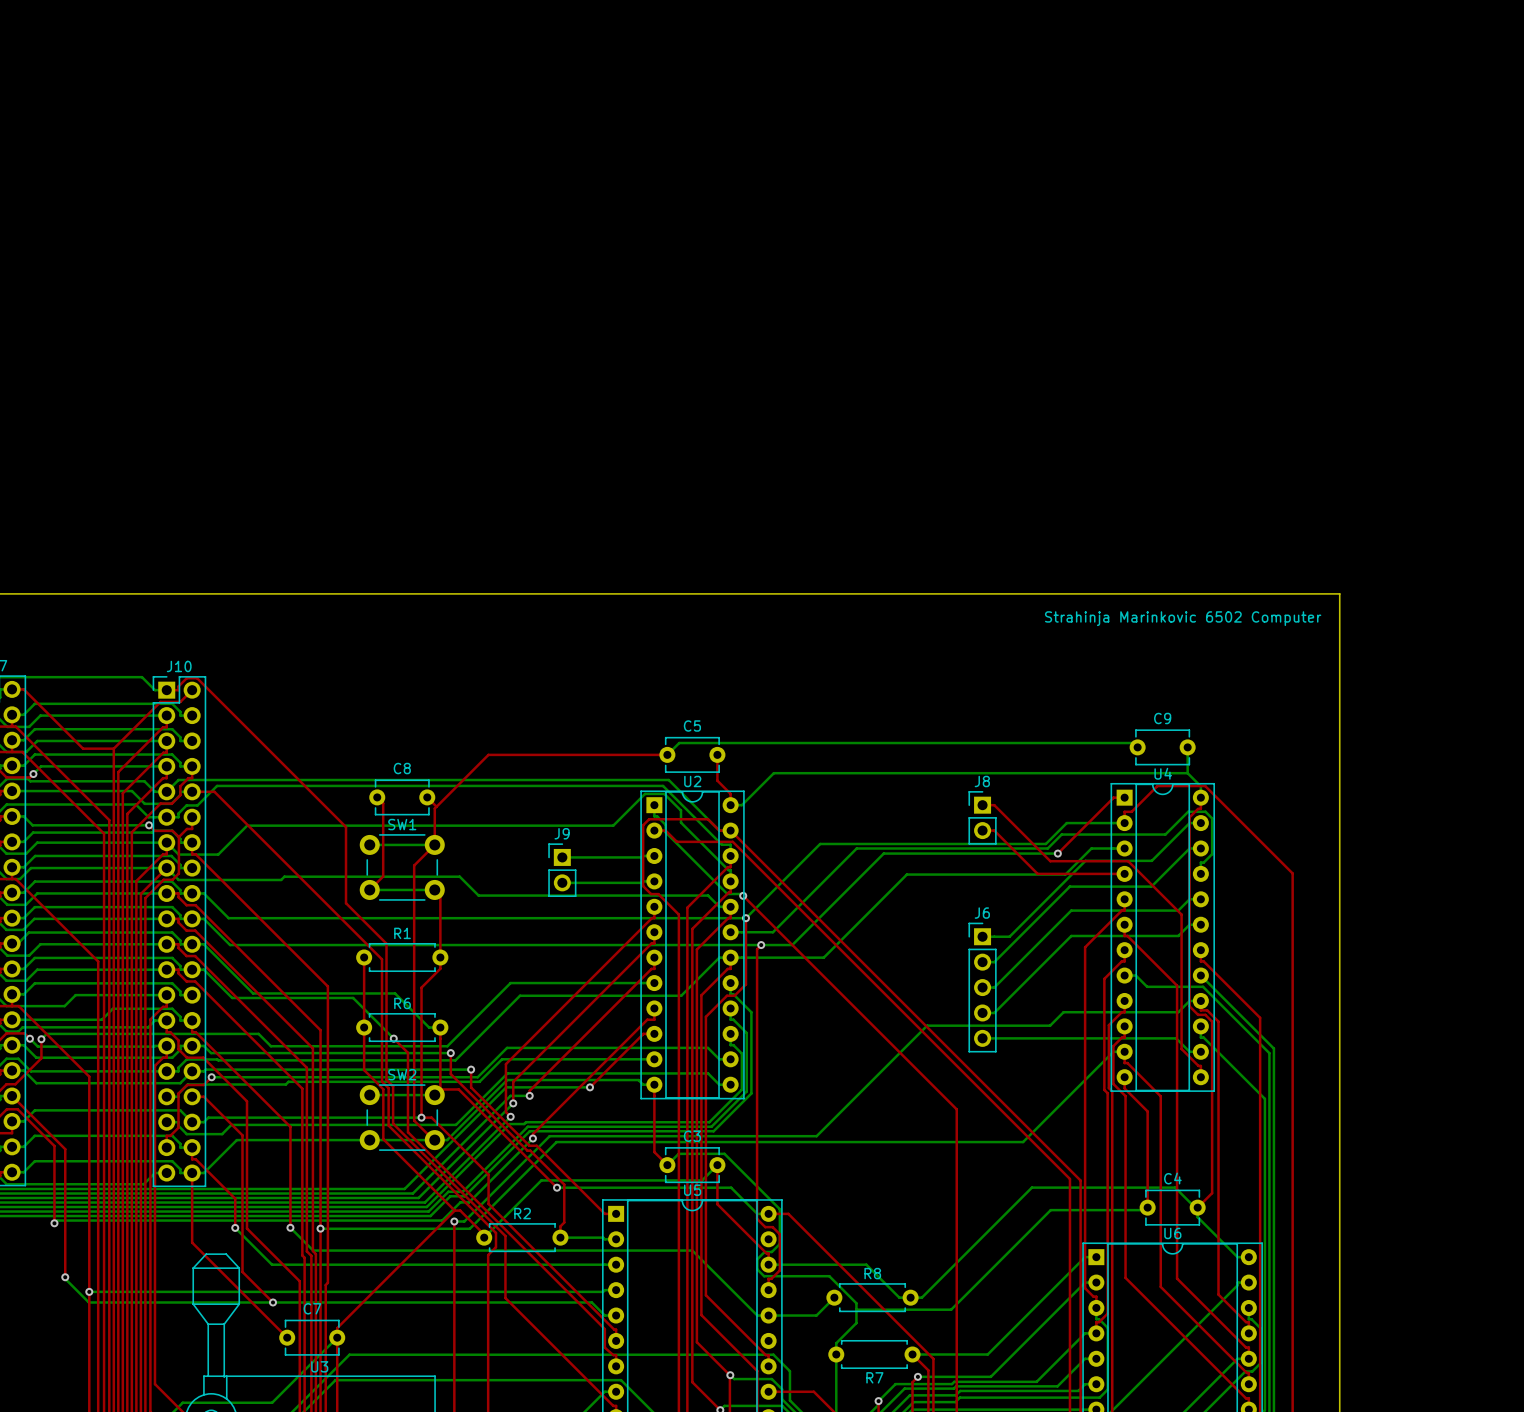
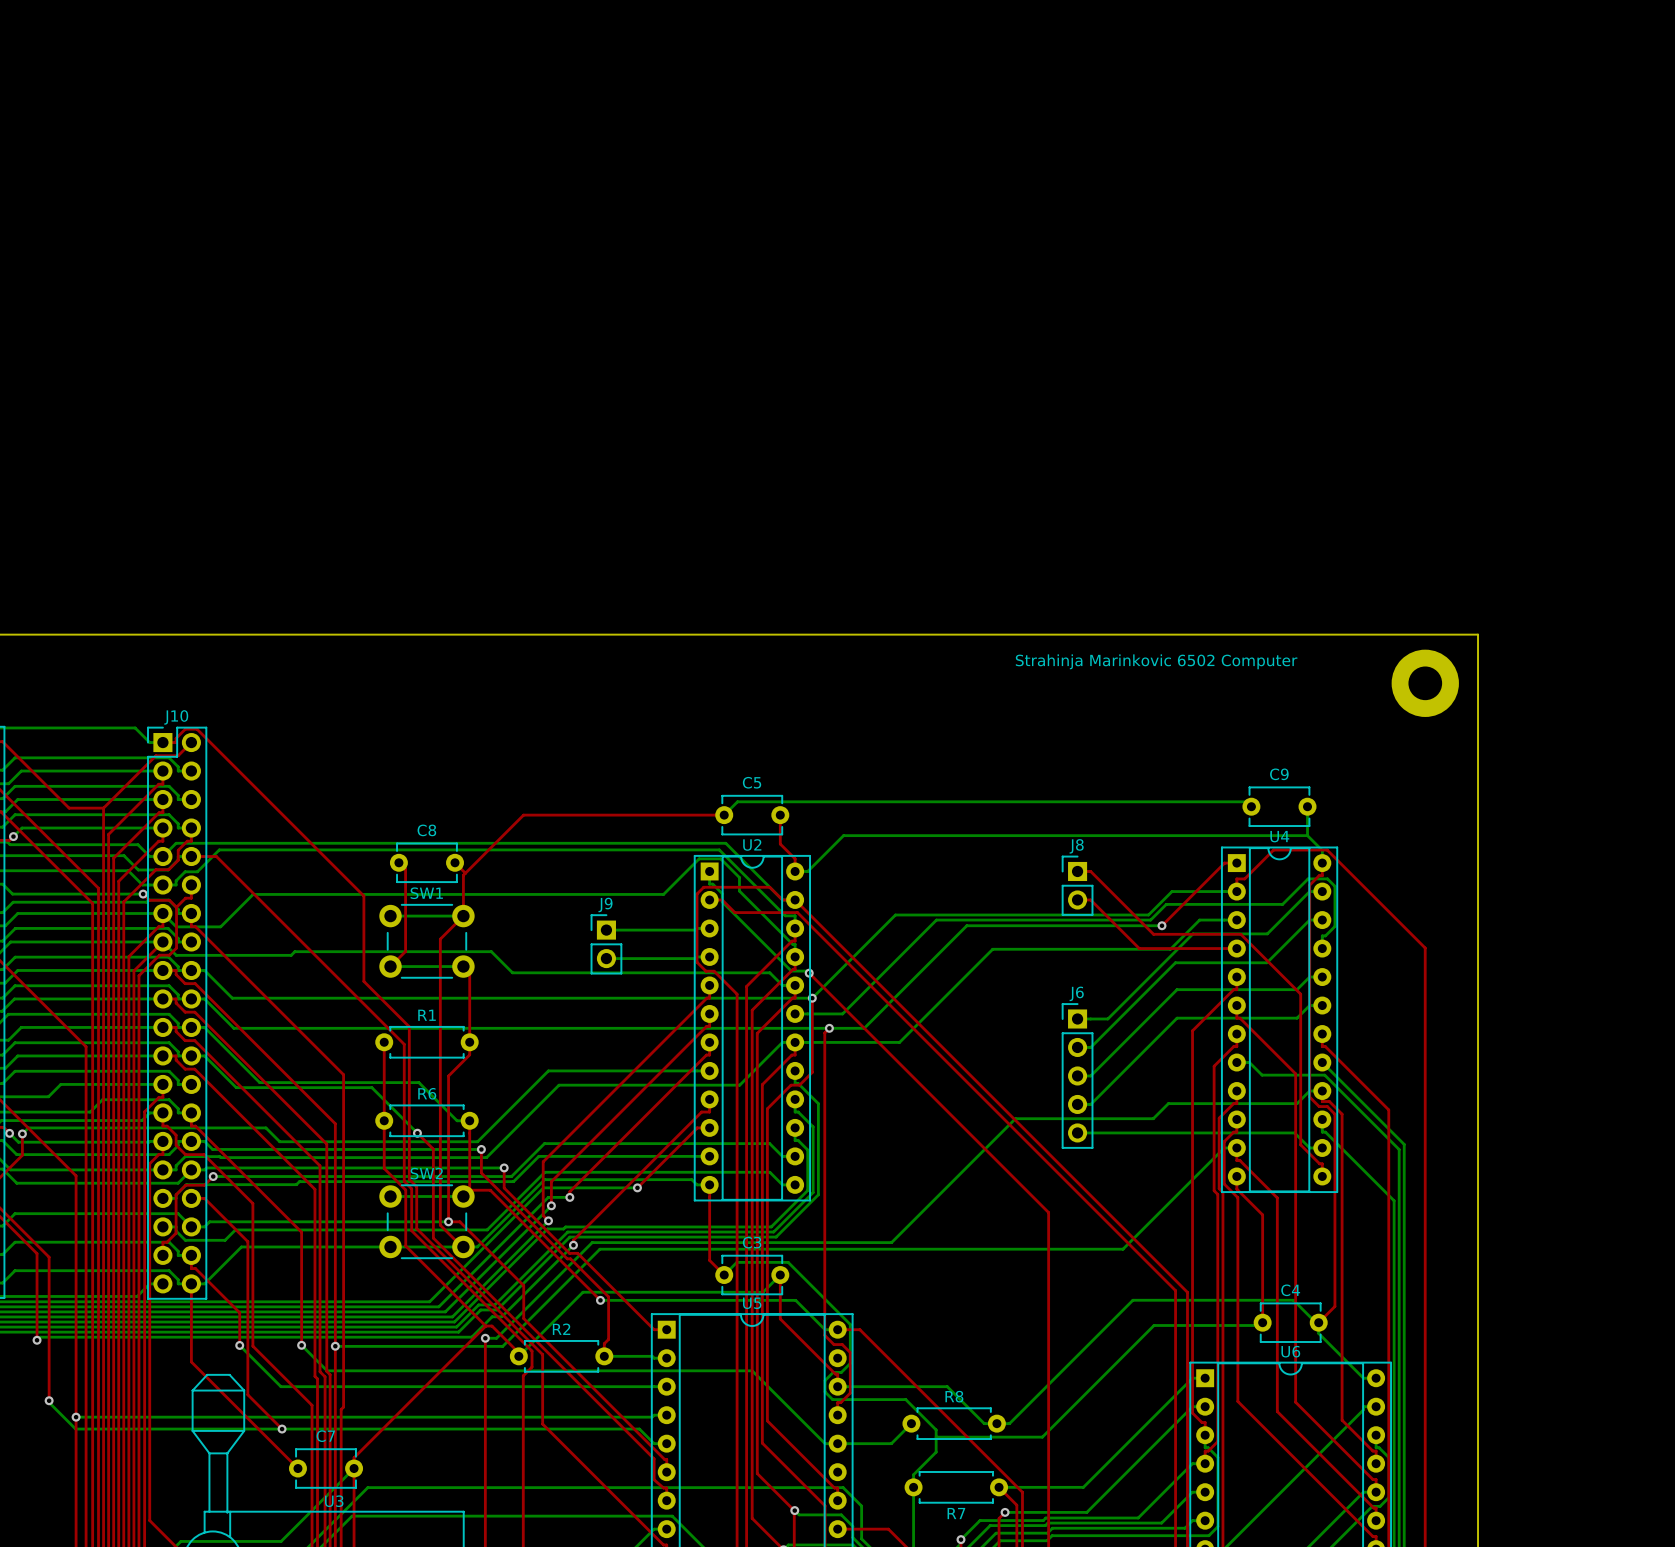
text position: Strahinja Marinkovic 6502 Computer (1183, 618) -> Strahinja Marinkovic 6502 Computer (1156, 661)
part: none -> (1425, 683)

